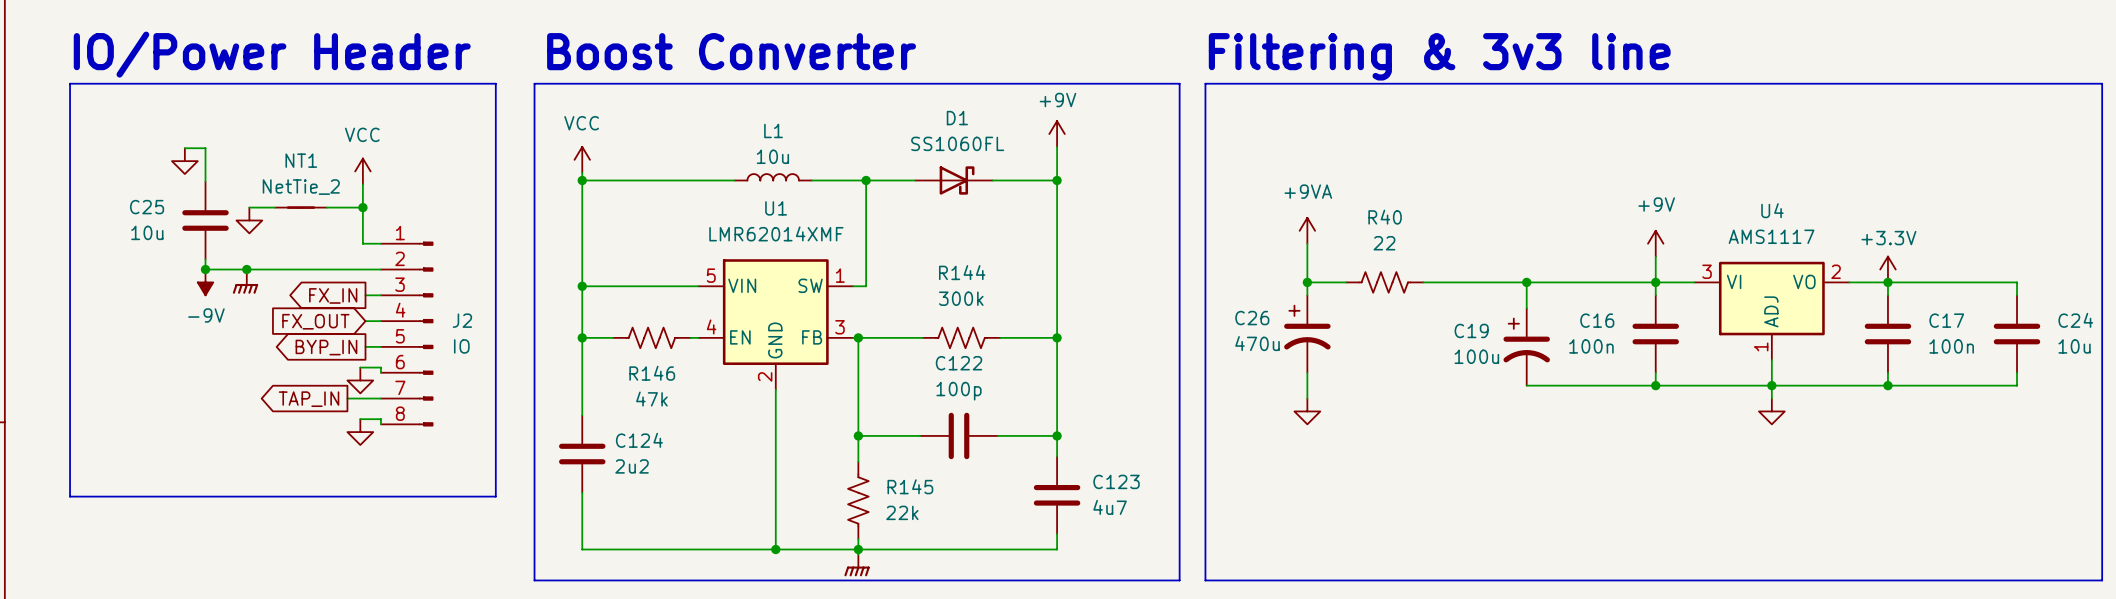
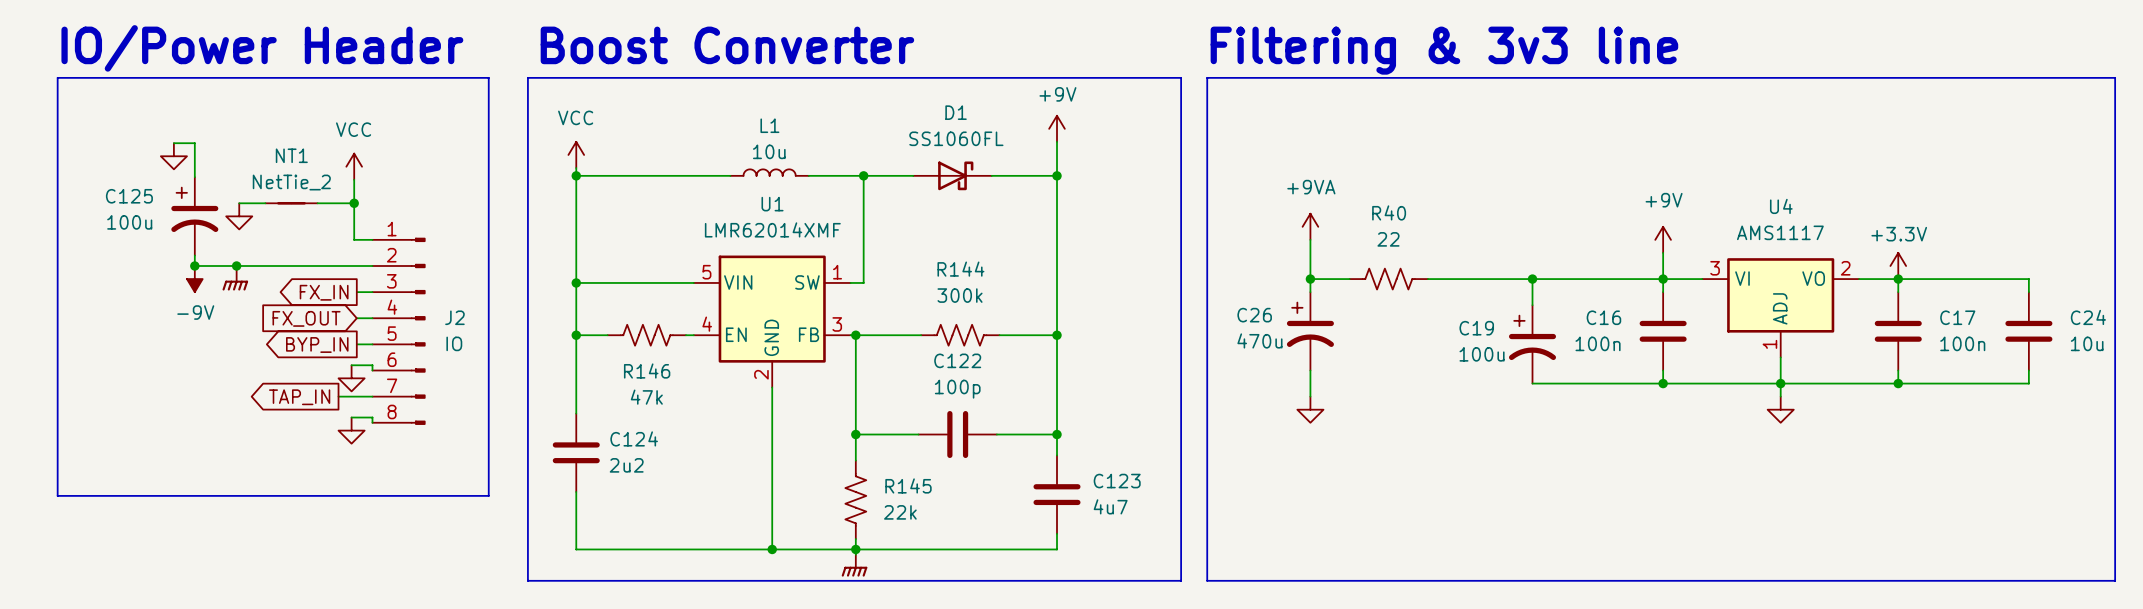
C25: 10u (205, 220) -> none
C125: none -> 100u (194, 216)

